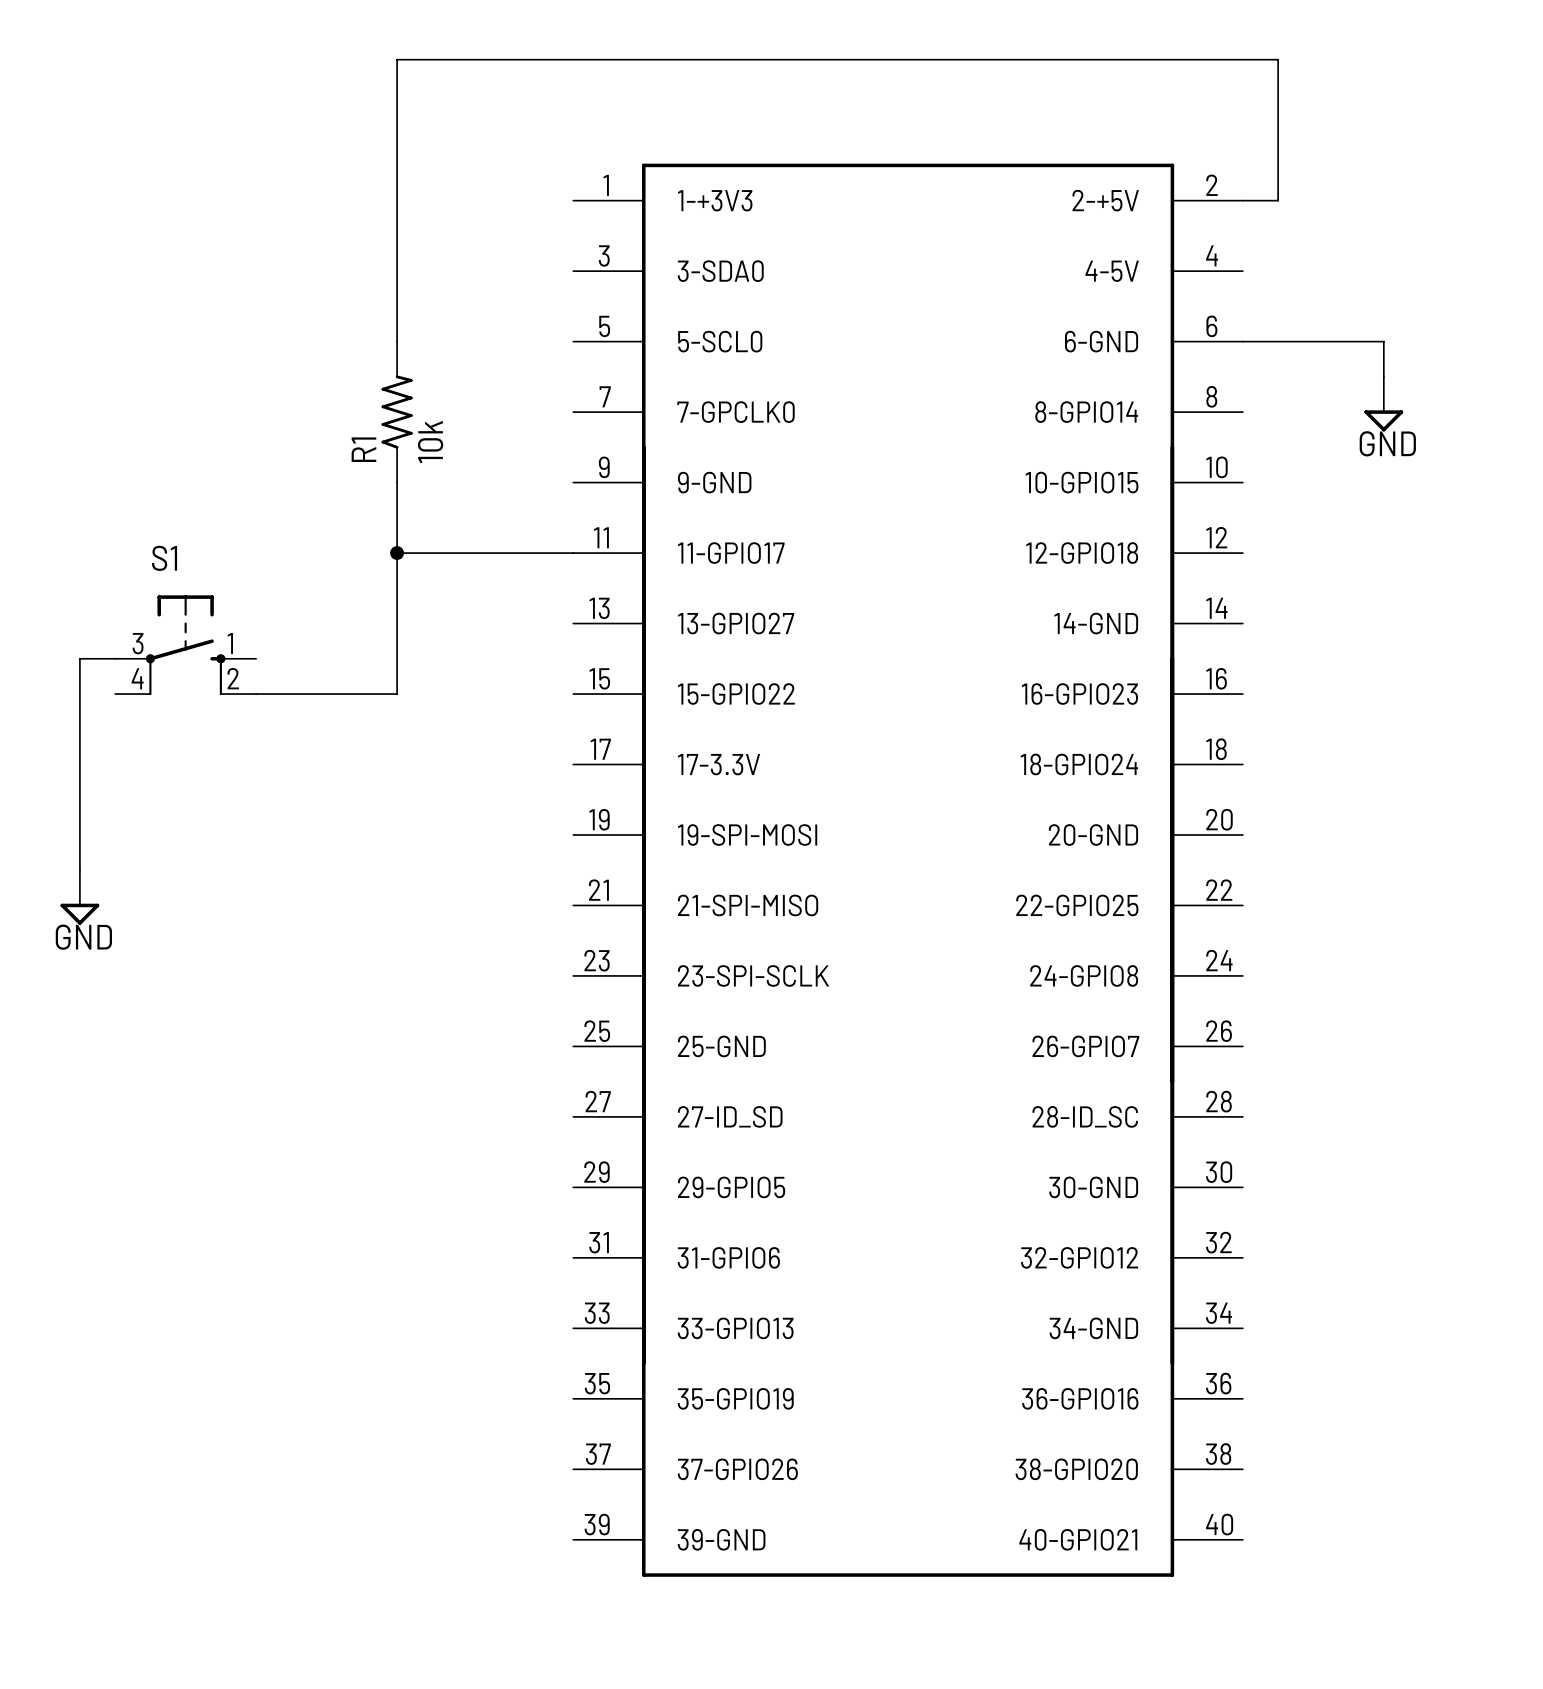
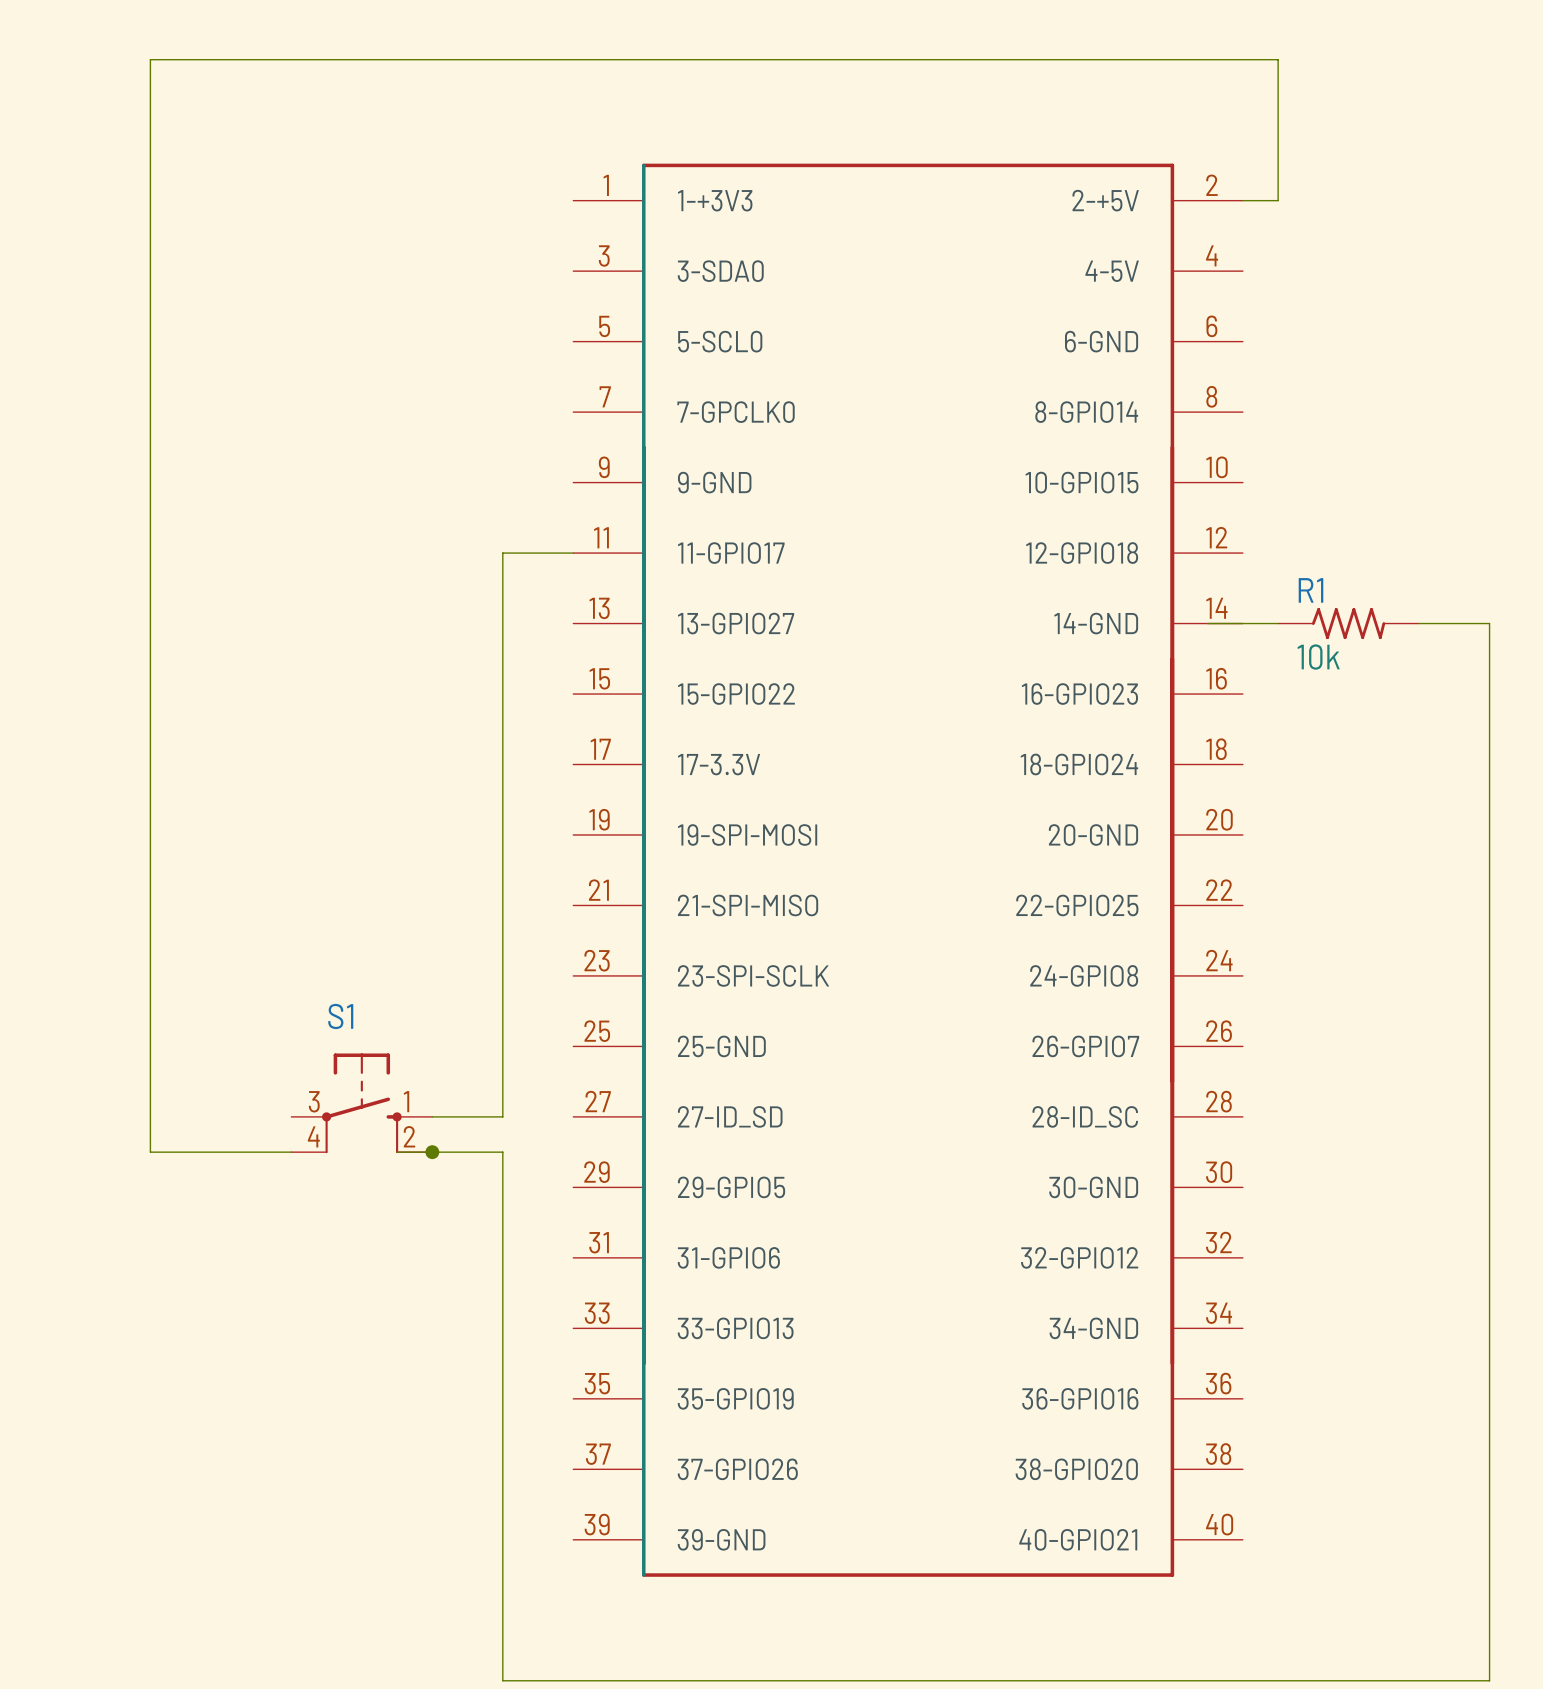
wire: (397, 59) (397, 341) -> (397, 59) (150, 59) (150, 1152) (291, 1152)
wire: (1242, 341) (1383, 341) (1383, 376) -> none
power symbol: GND (1383, 404) -> none
R1 rotation: 0° (397, 412) -> 90° clockwise (1348, 623)
R1 position: (397, 412) -> (1348, 623)
wire: (397, 482) (397, 694) (256, 694) -> none
wire: (397, 553) (502, 553) -> (432, 1116) (502, 1116) (502, 553)
junction: (397, 553) -> none
wire: none -> (1207, 623) (1278, 623)
wire: none -> (1419, 623) (1489, 623) (1489, 1680) (502, 1680) (502, 1152) (397, 1152)
S1 position: (185, 645) -> (361, 1103)
wire: (115, 658) (79, 658) (79, 870) -> none
power symbol: GND (79, 897) -> none
junction: none -> (432, 1152)

